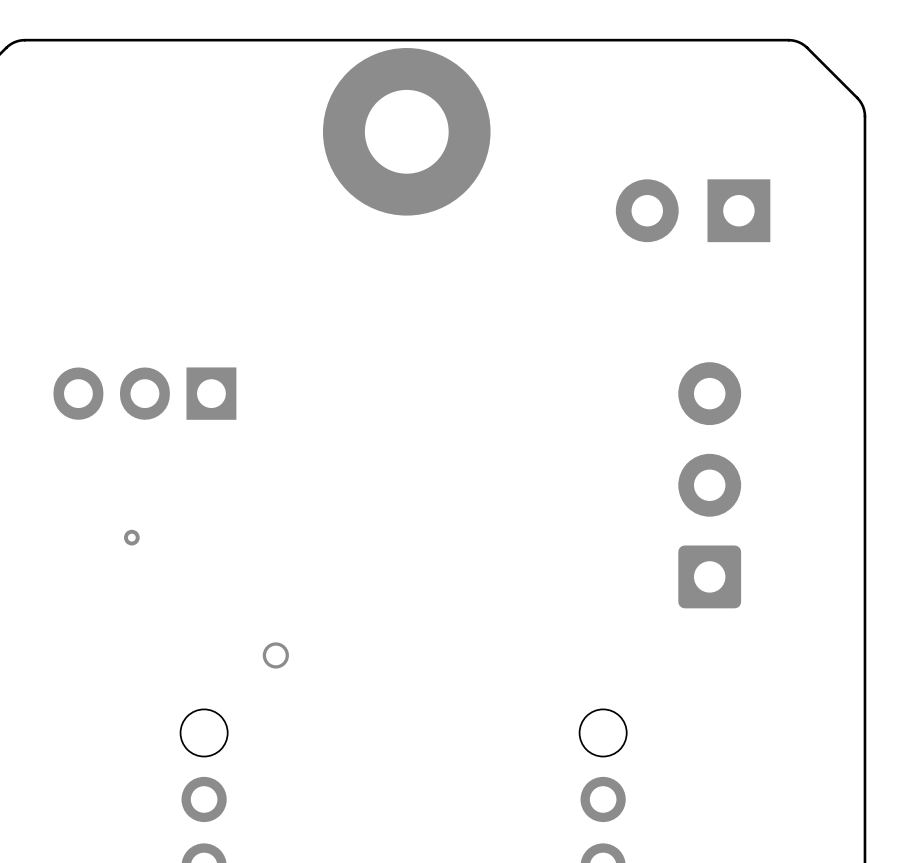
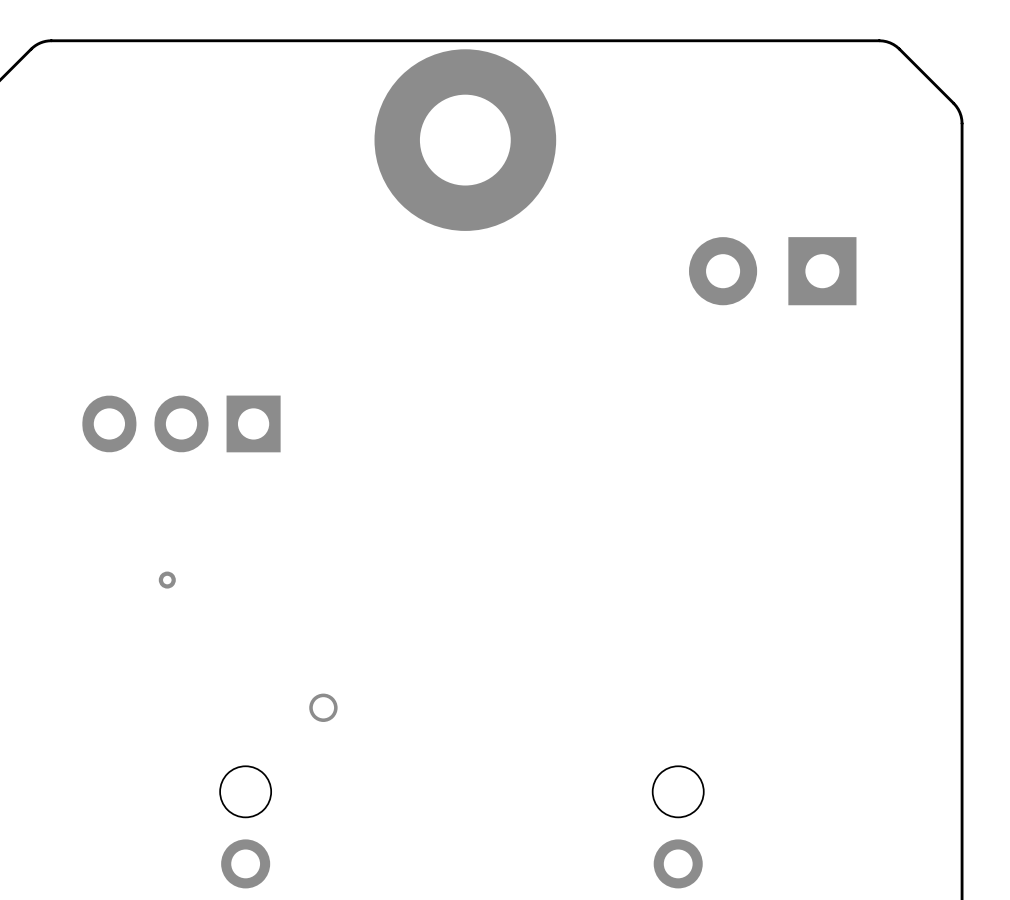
part position: (693, 210) -> (772, 271)
part: (709, 485) -> none

